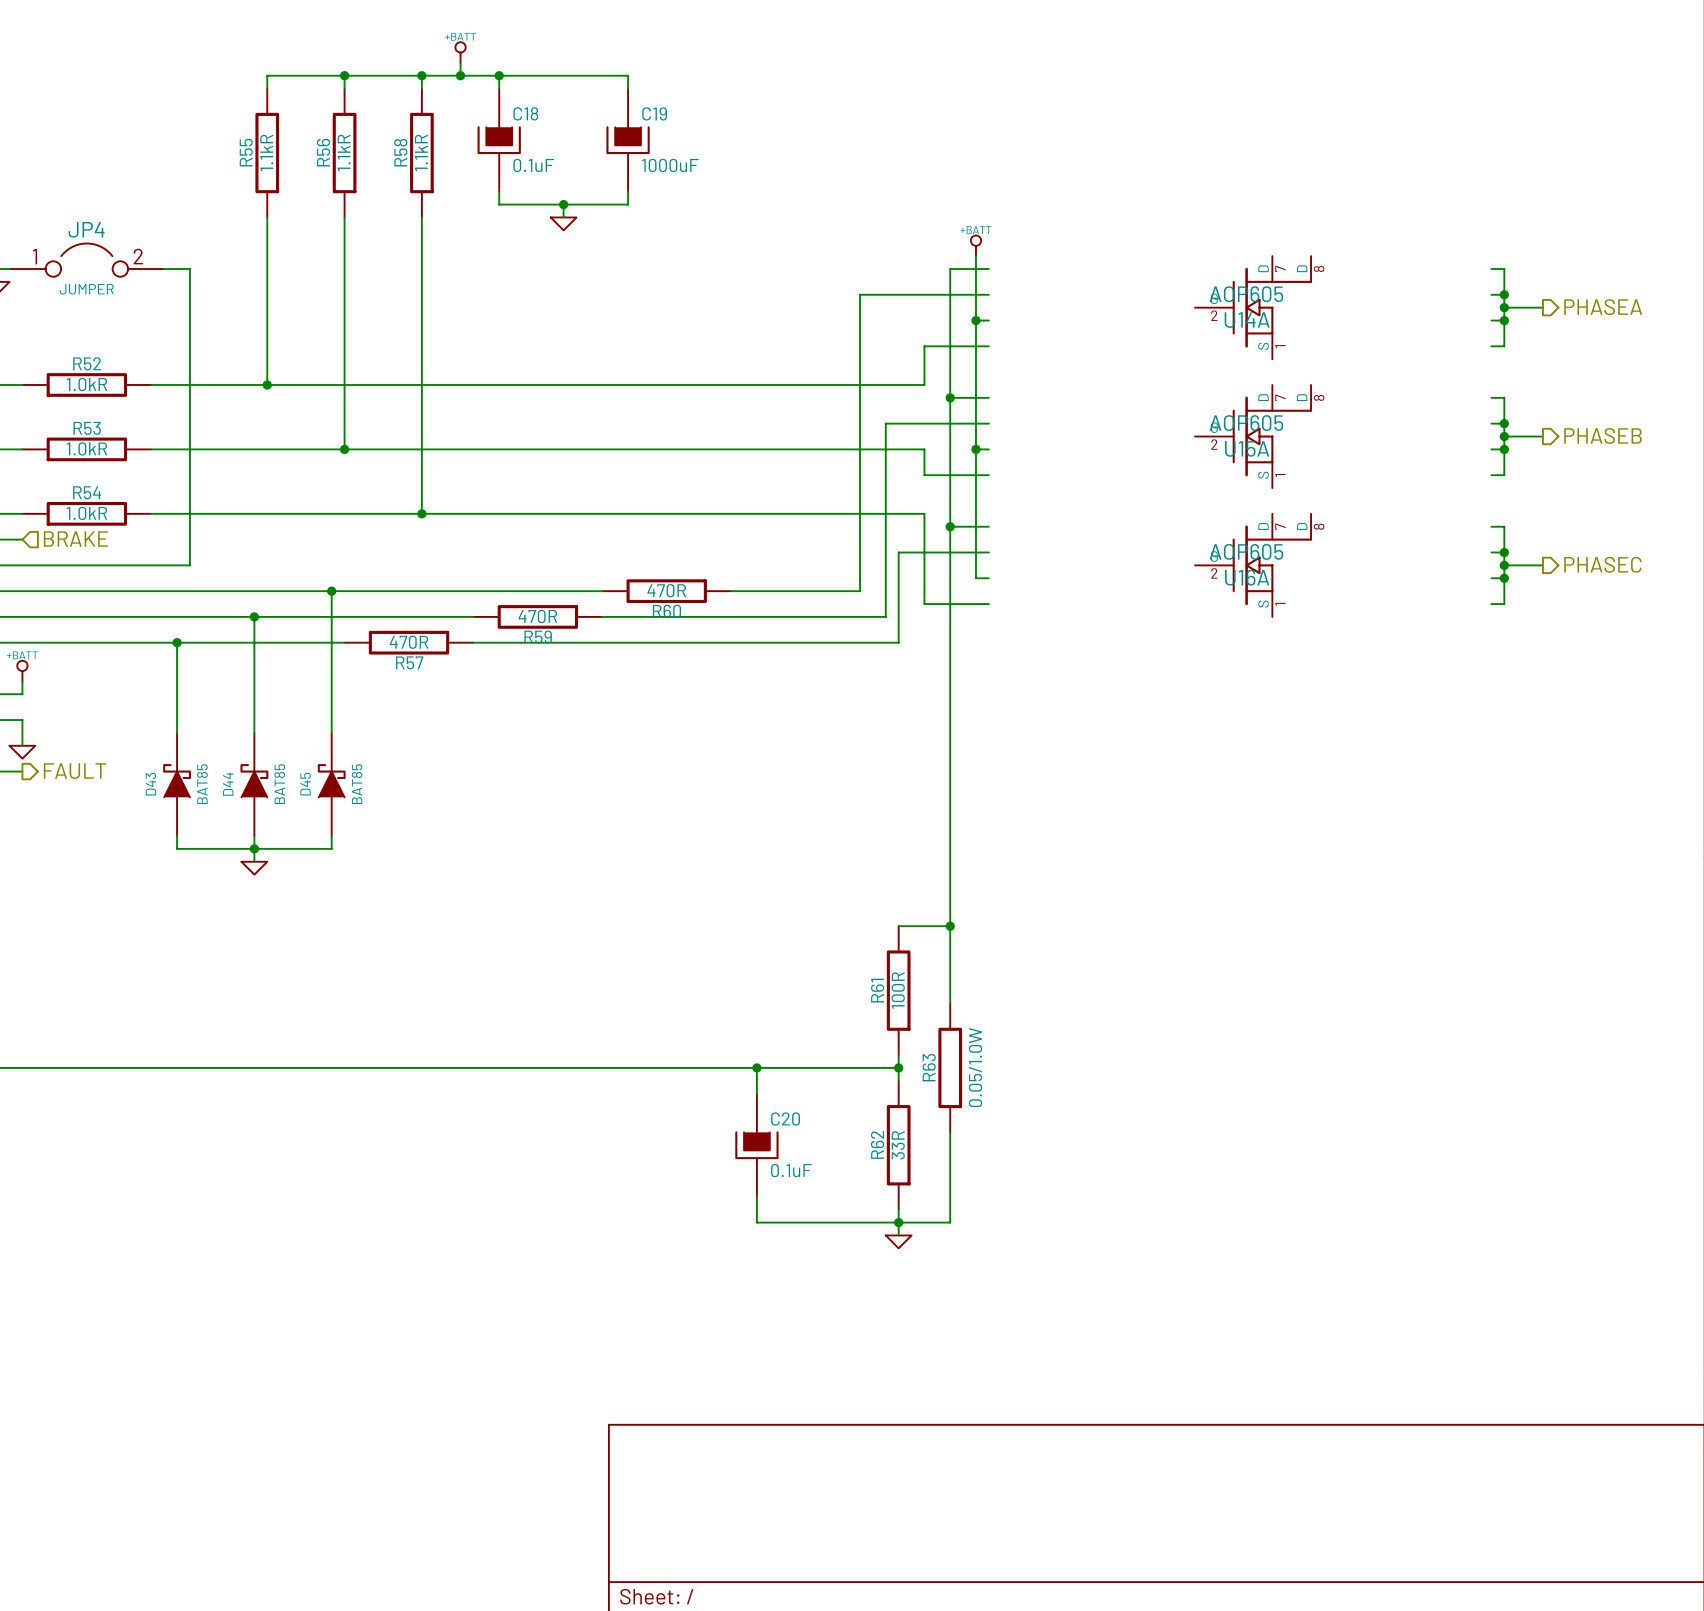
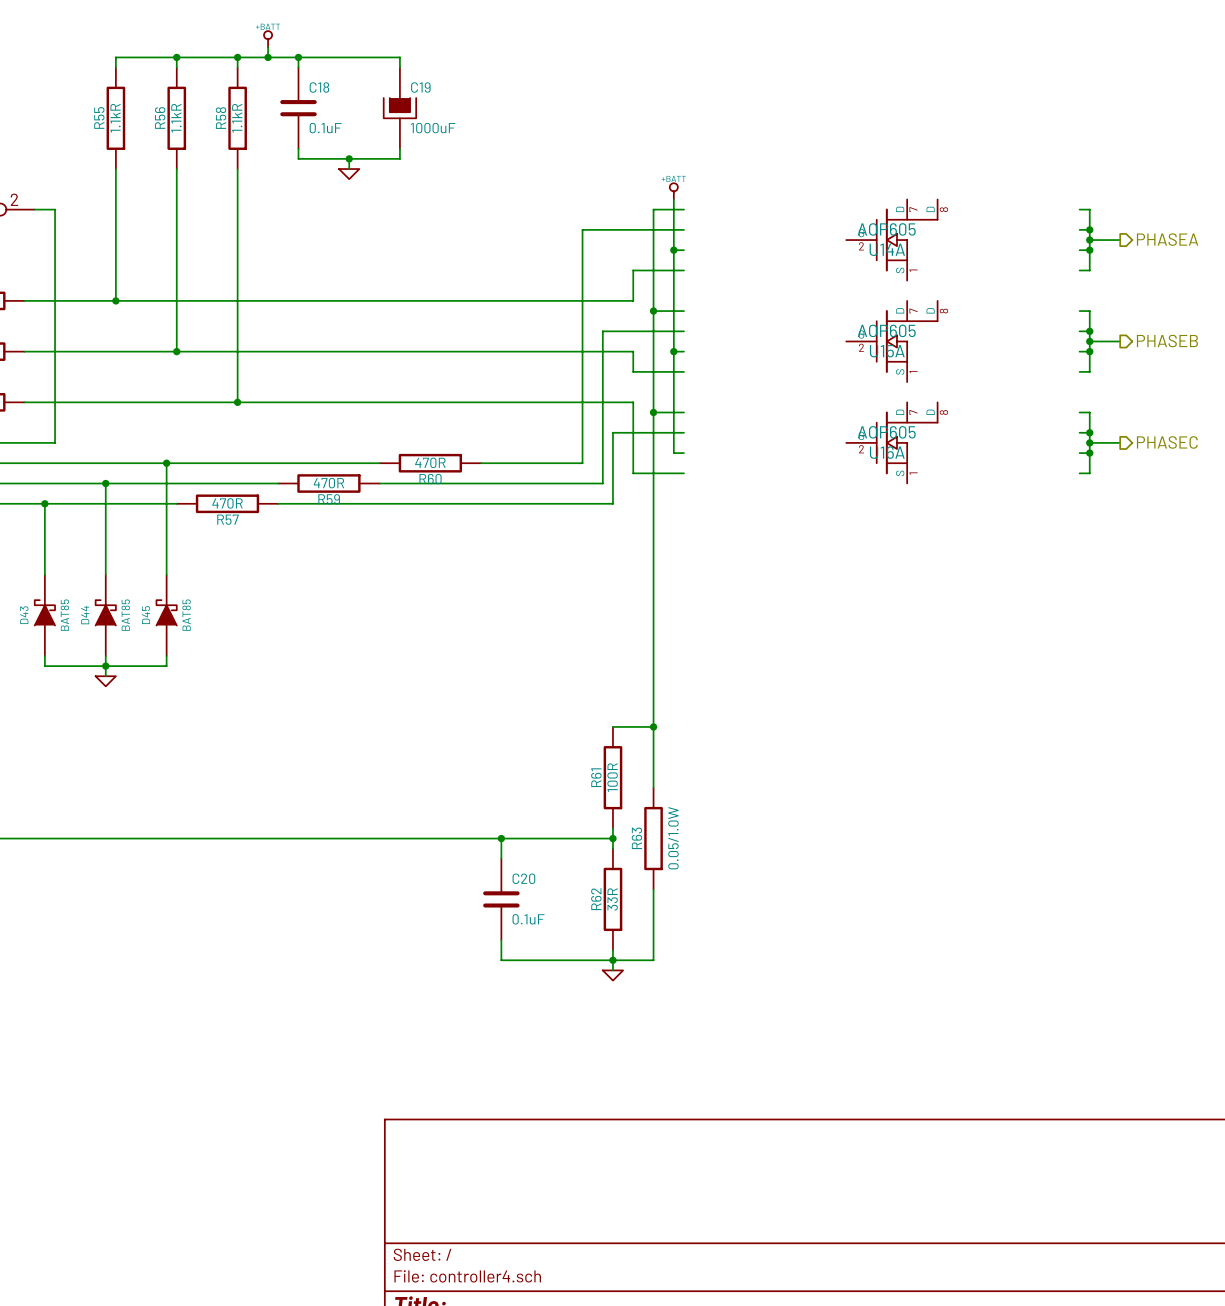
C18 symbol: [477, 88, 521, 192] -> [280, 67, 317, 149]
C20 symbol: [735, 1093, 779, 1197] -> [483, 858, 520, 940]

